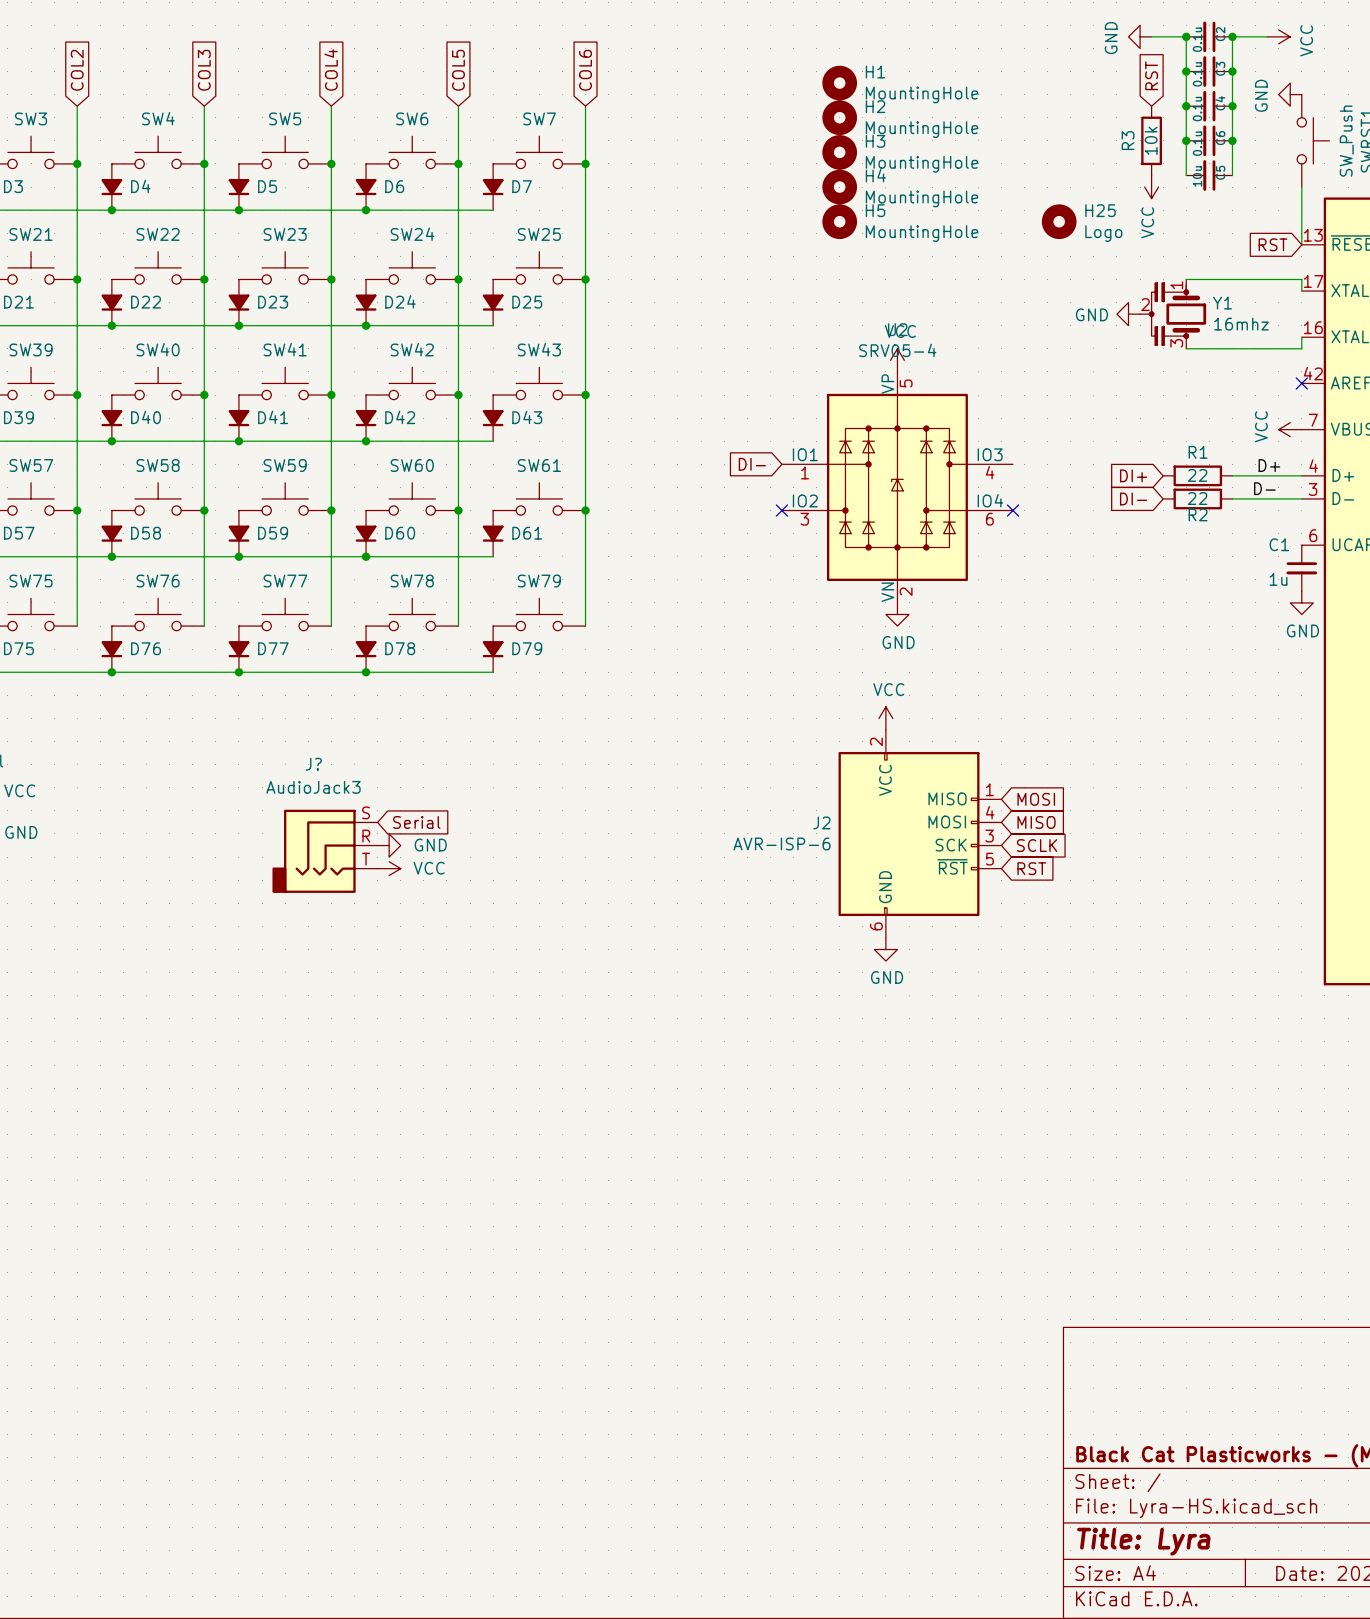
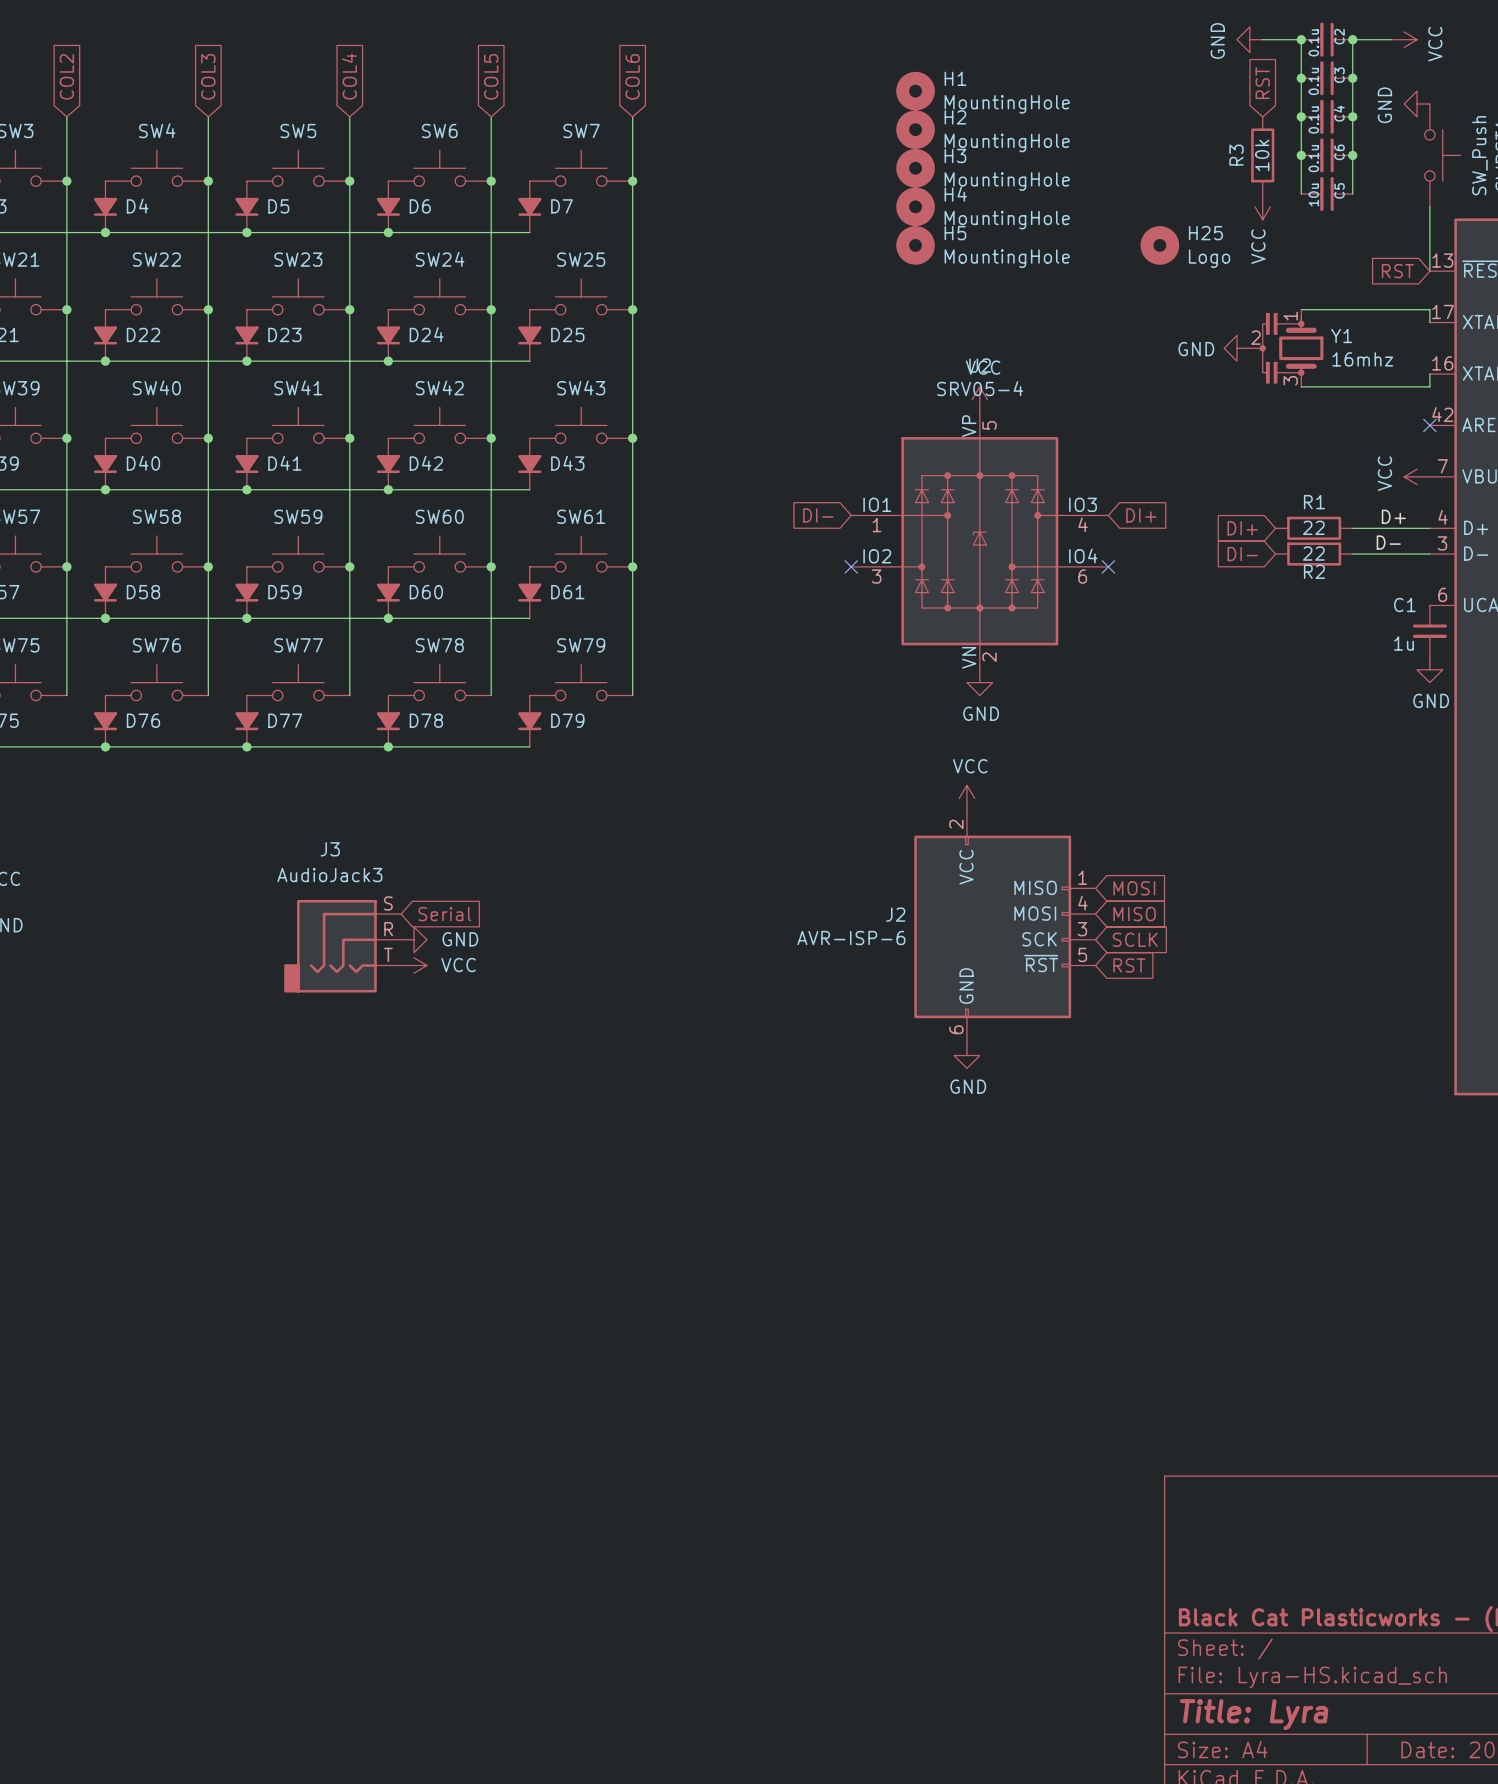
global label: none -> DI+ (1141, 515)
J? name: J? (313, 764) -> J3 (330, 849)

